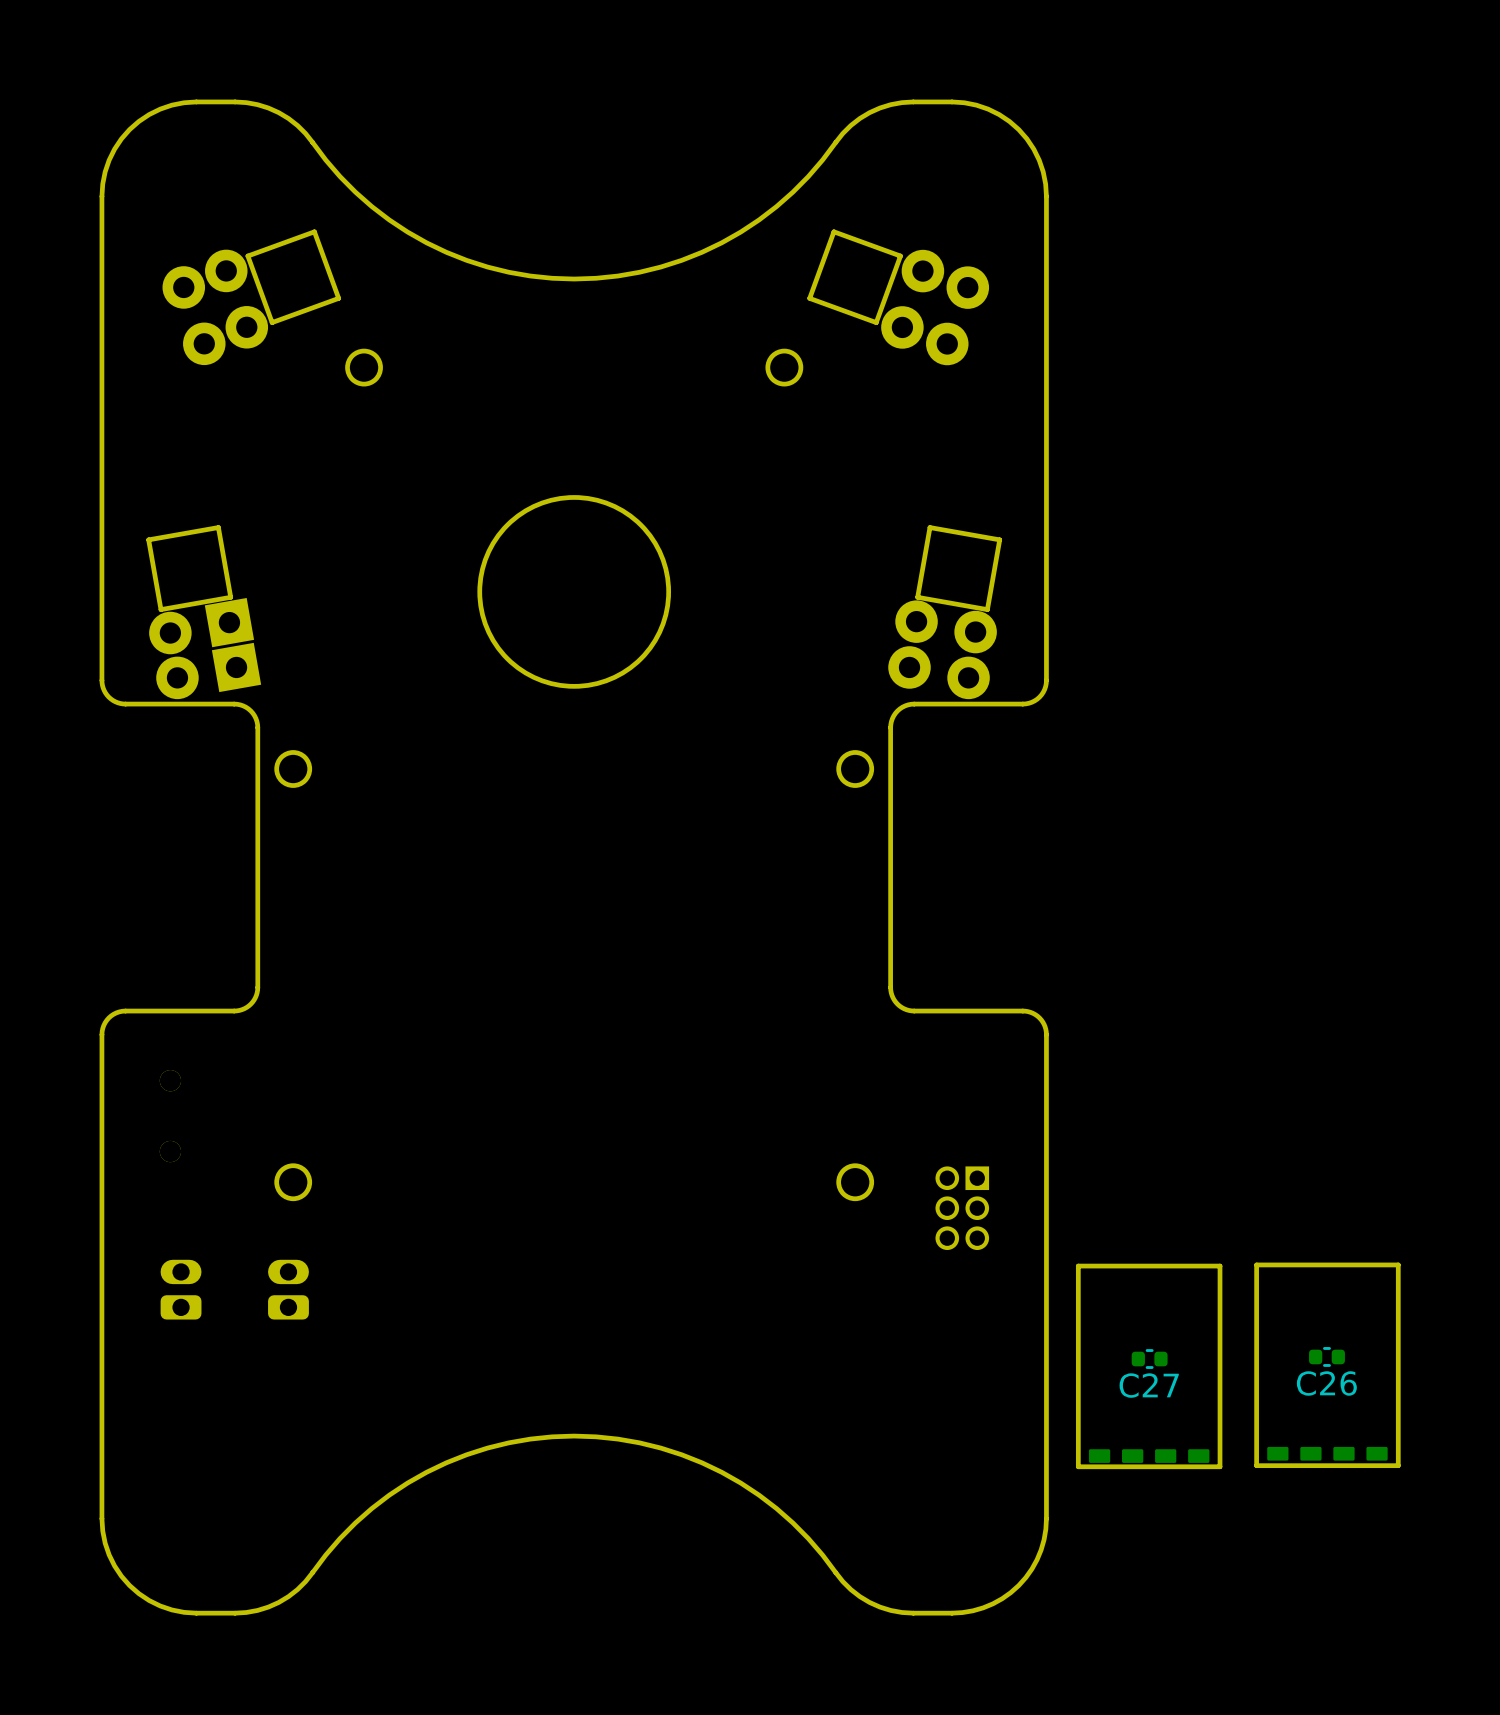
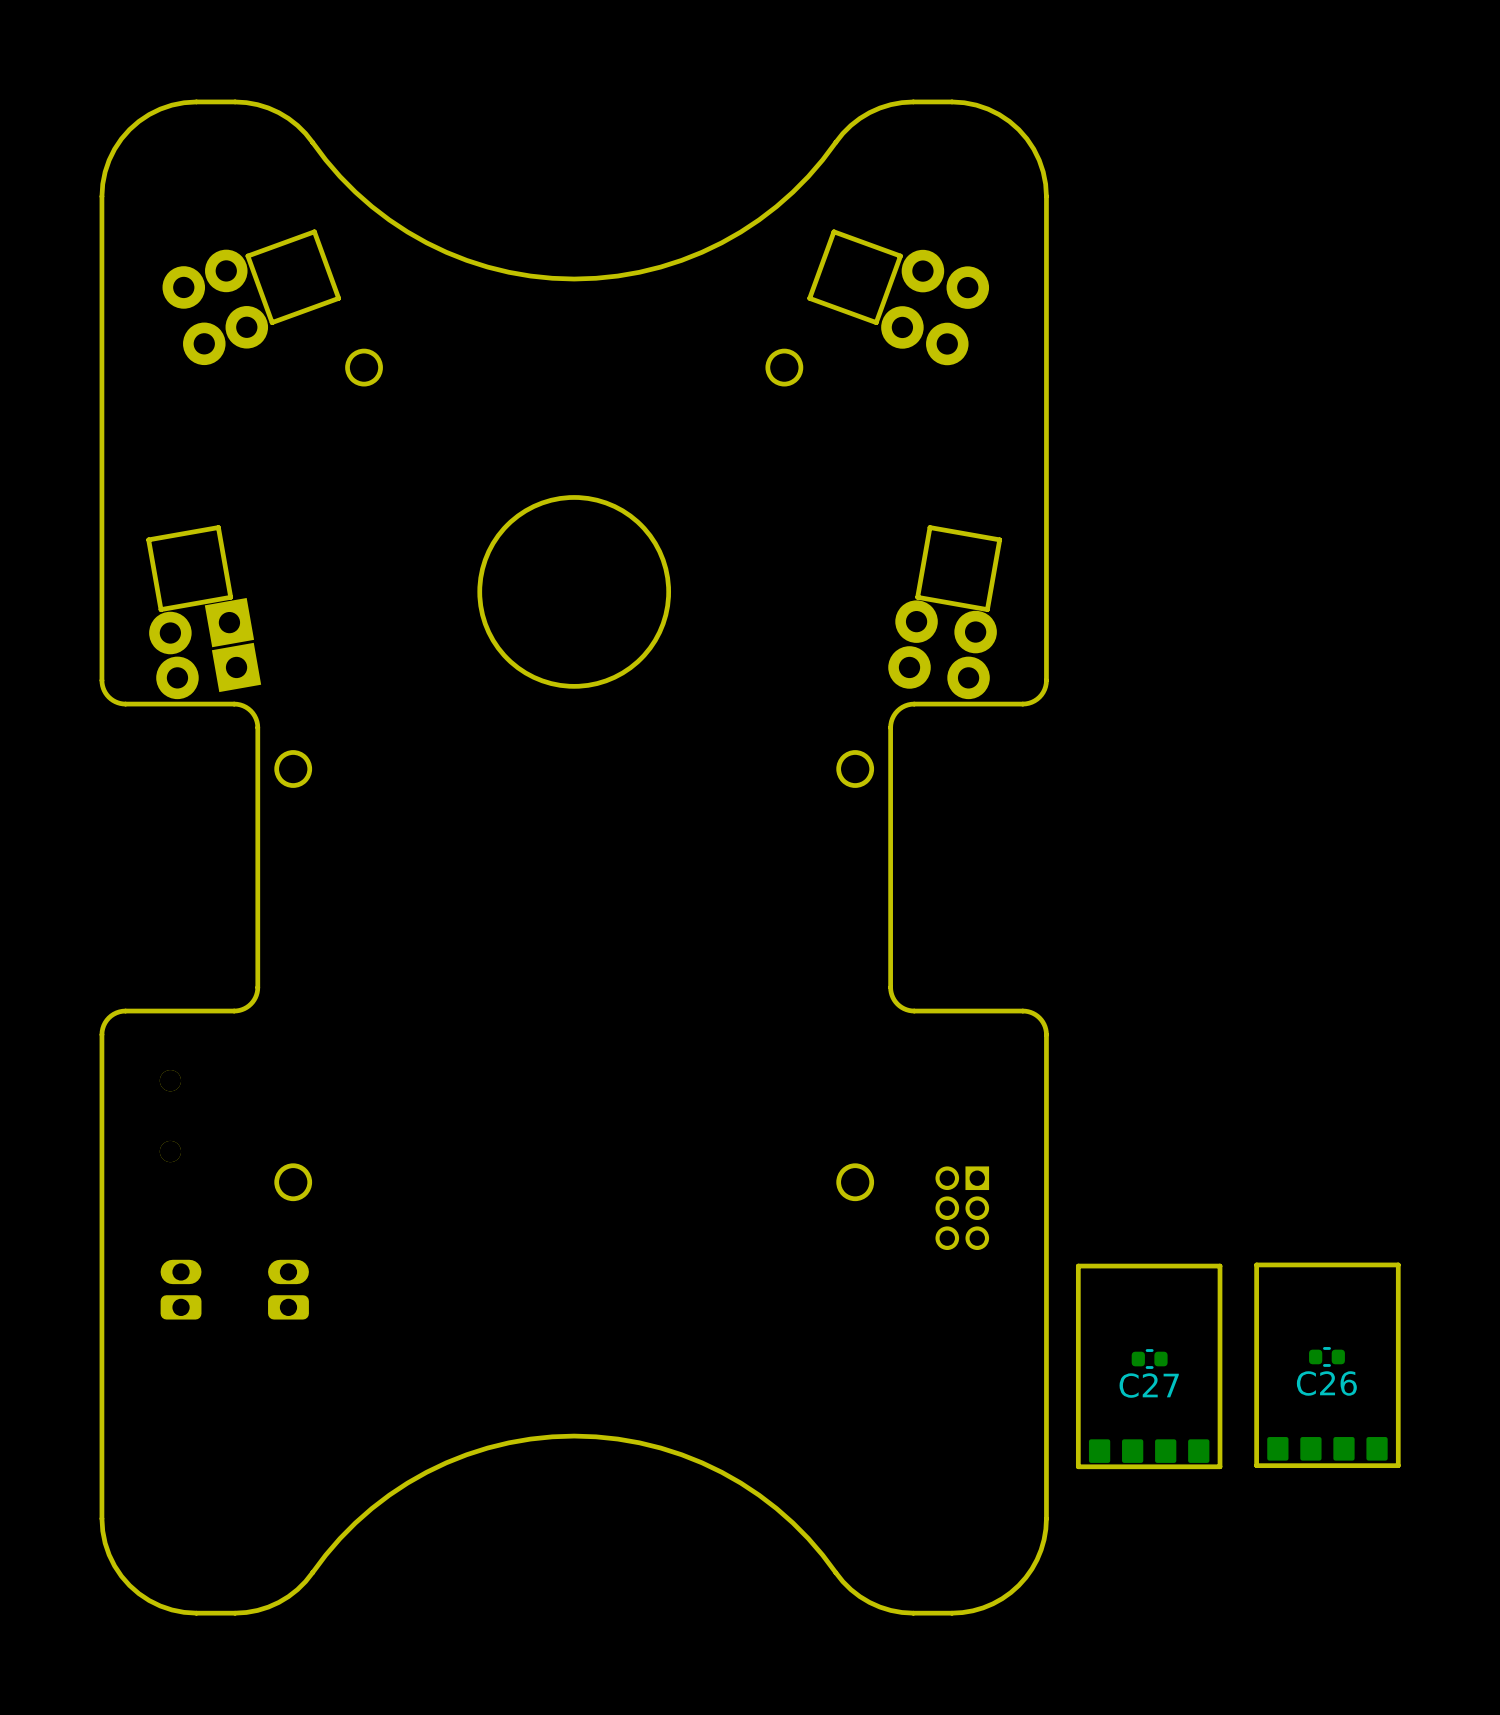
part footprint: [1267, 1446, 1388, 1461] -> [1267, 1437, 1388, 1461]
part footprint: [1088, 1449, 1210, 1463] -> [1088, 1439, 1210, 1463]

